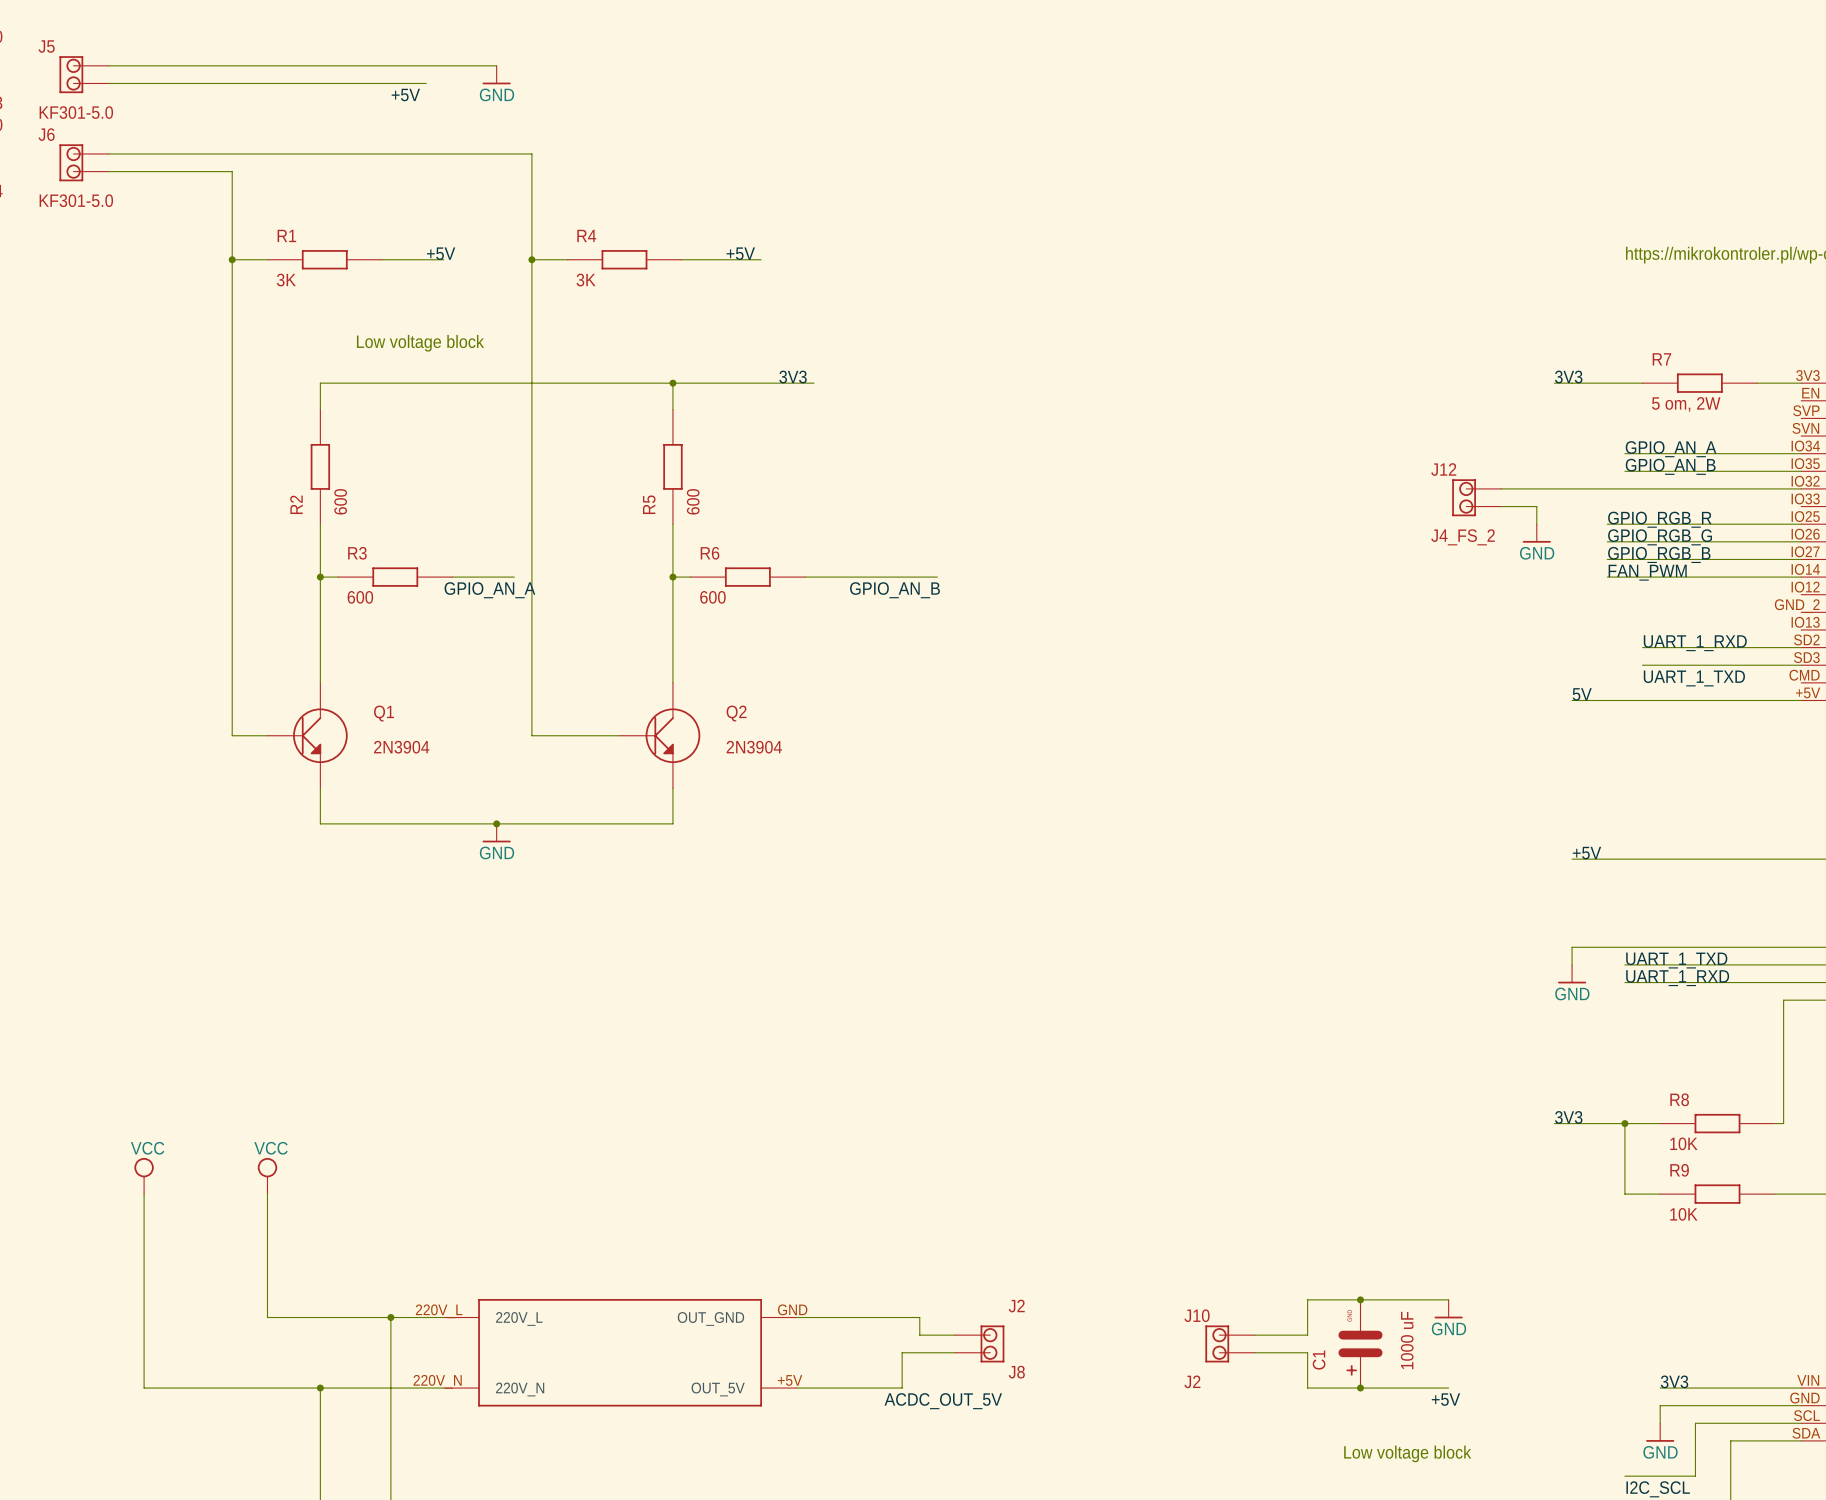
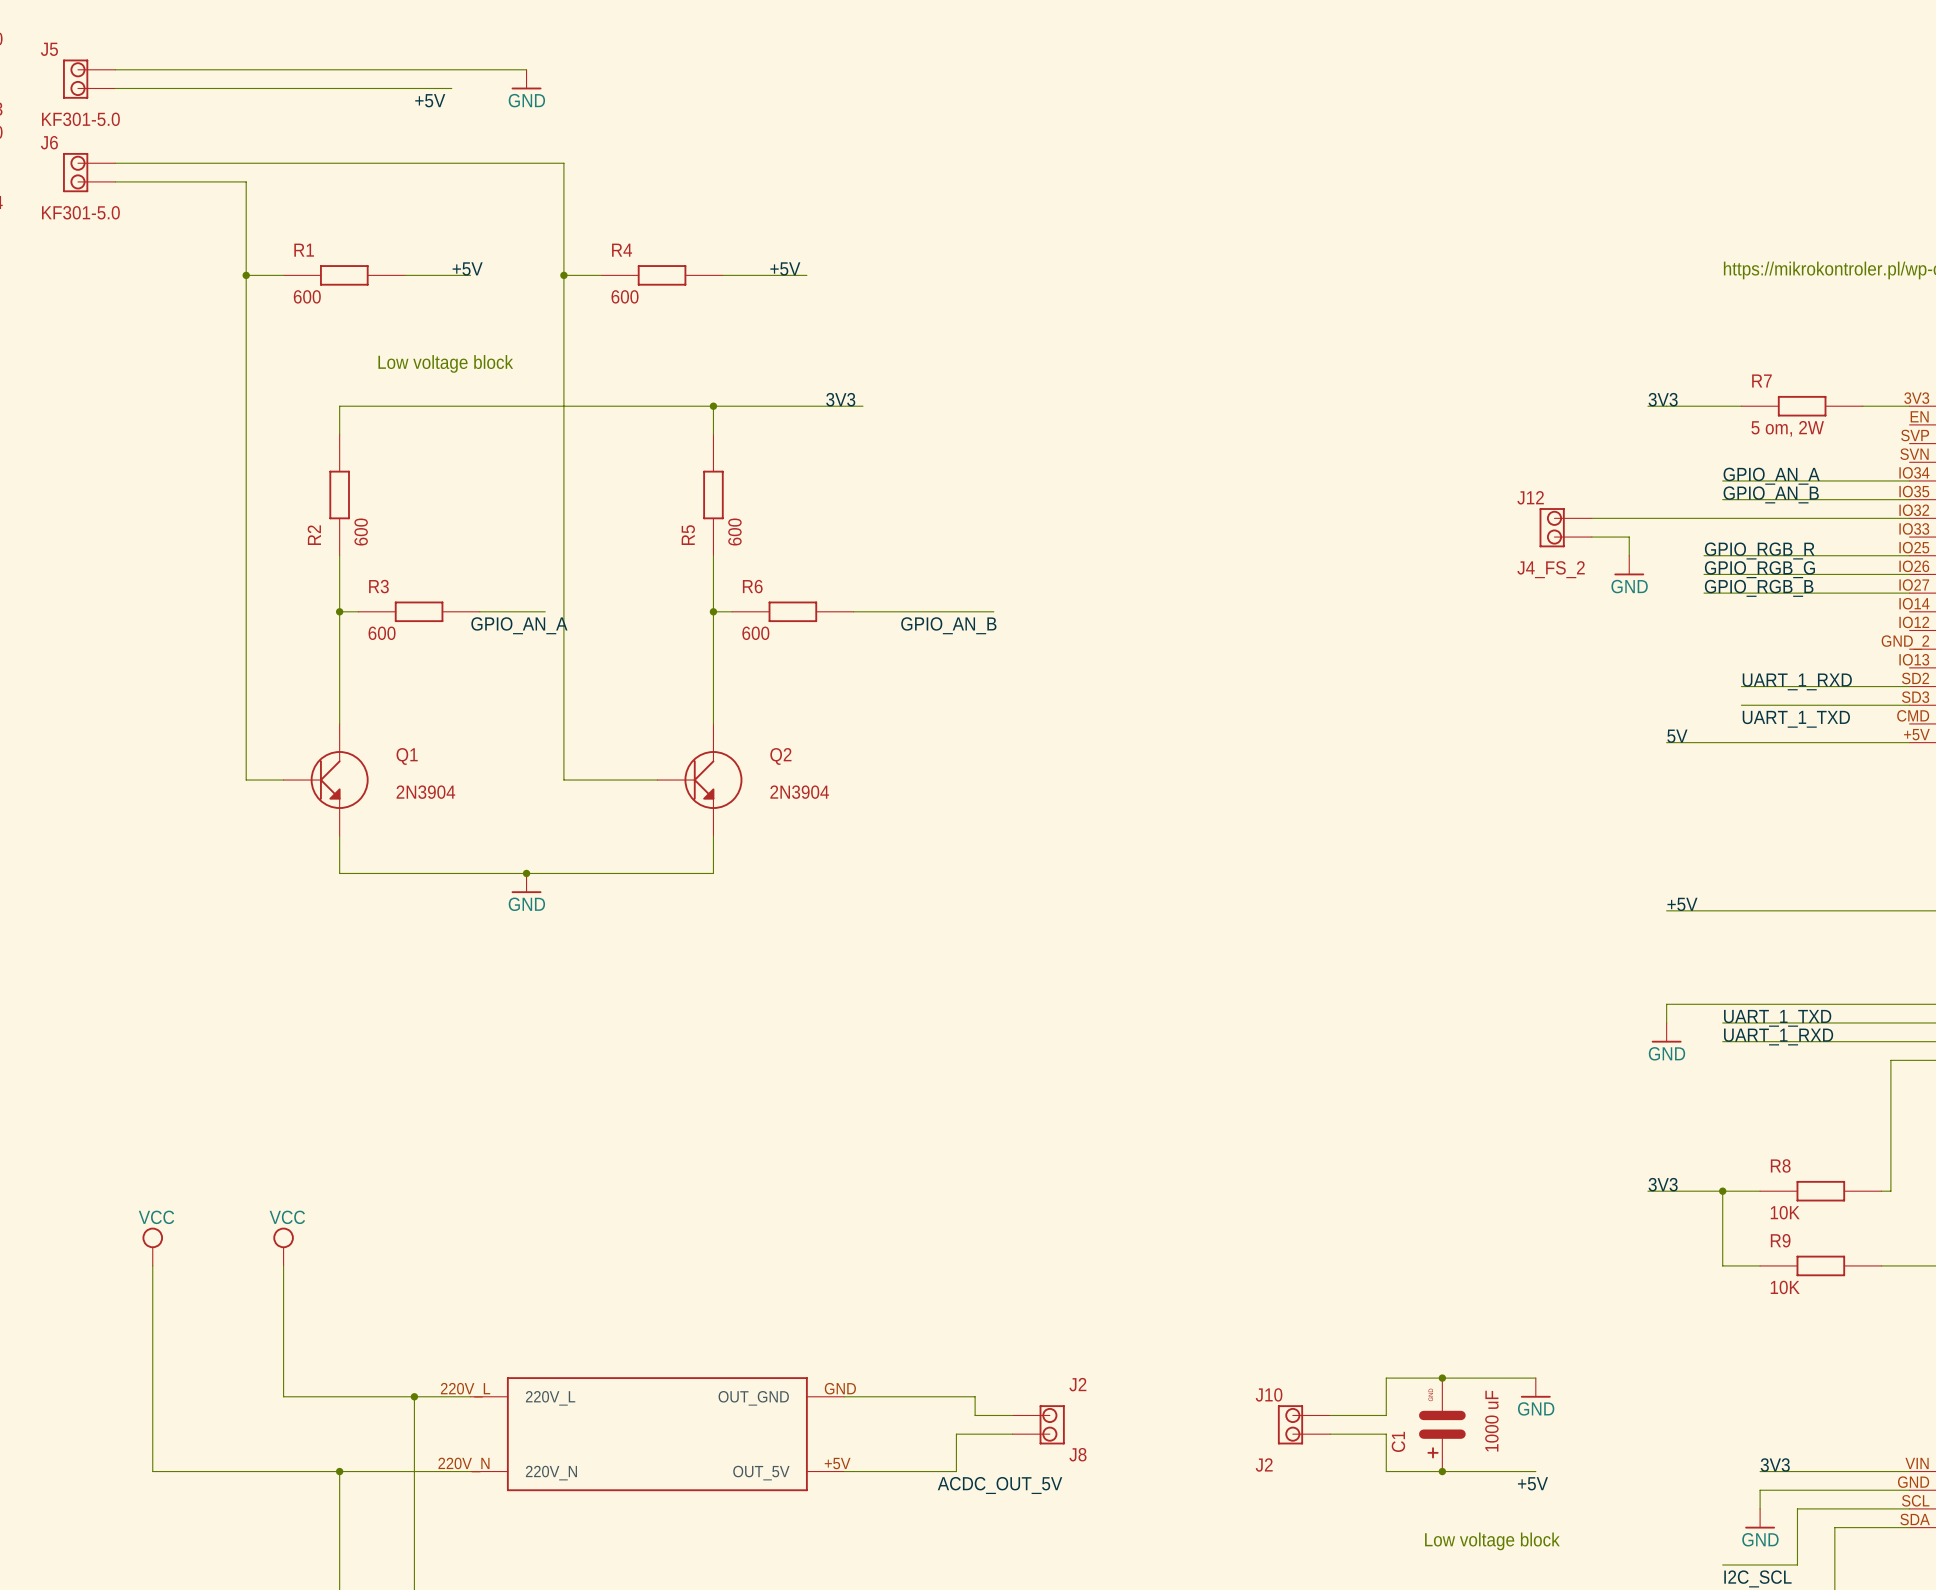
R1 value: 3K (286, 280) -> 600 (307, 296)
R4 value: 3K (586, 280) -> 600 (625, 296)
label: FAN_PWM (1647, 572) -> none
wire: (1607, 577) (1801, 577) -> none

